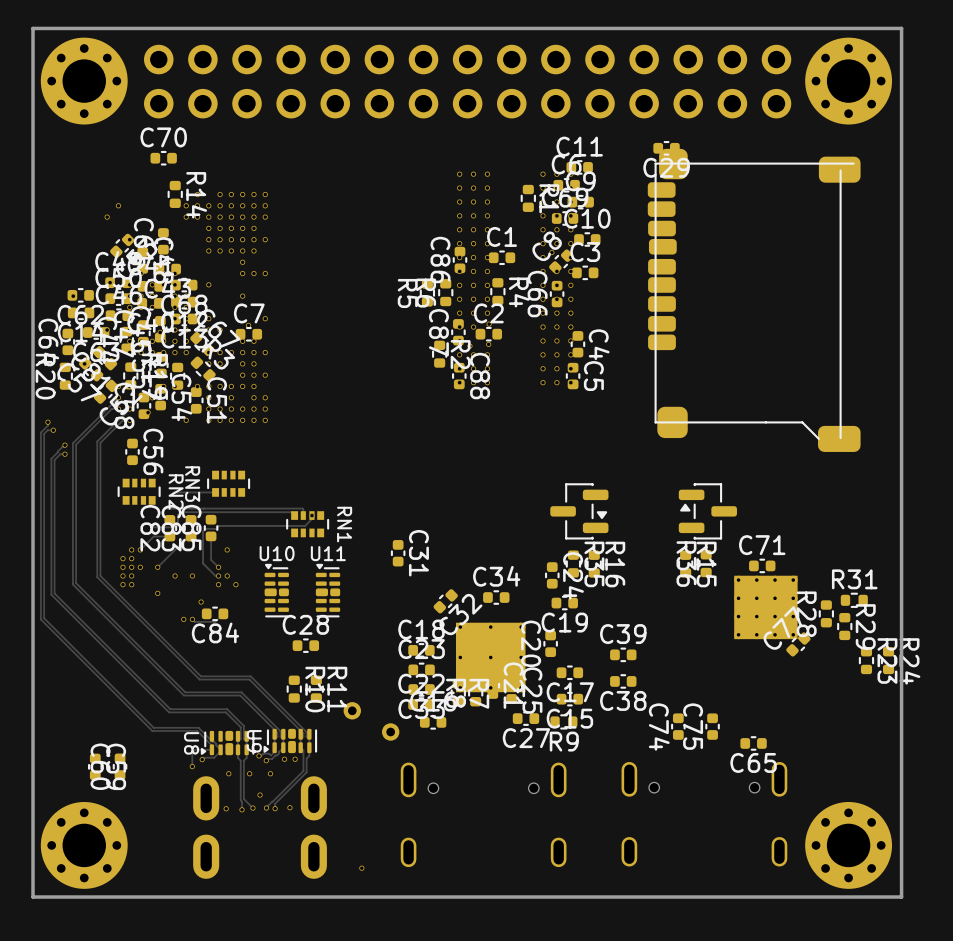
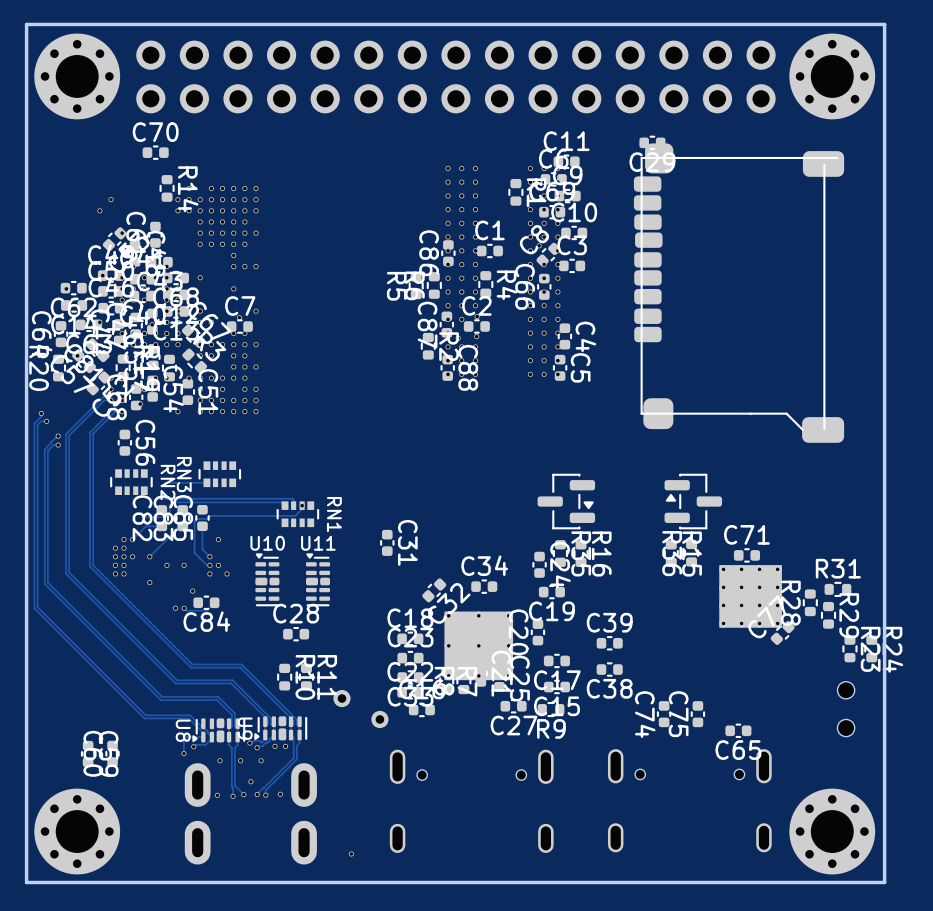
part: none -> (846, 709)

